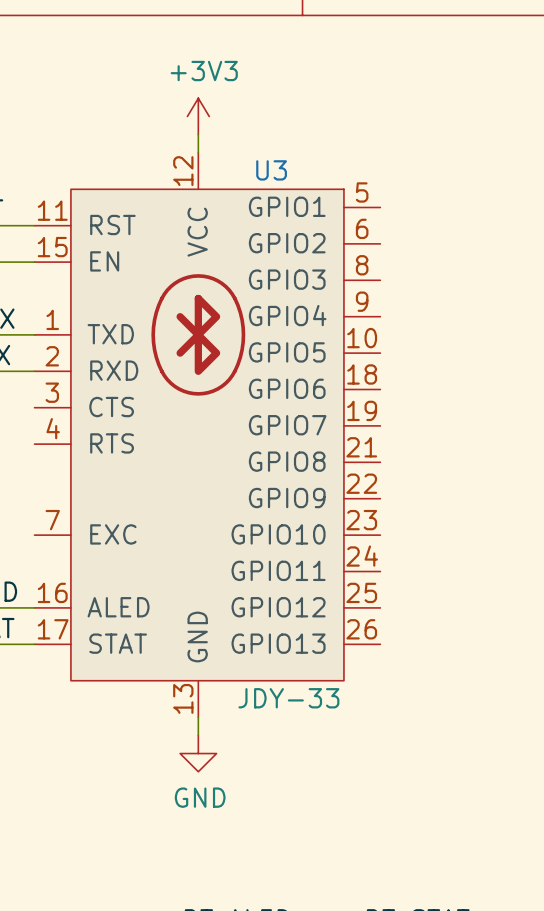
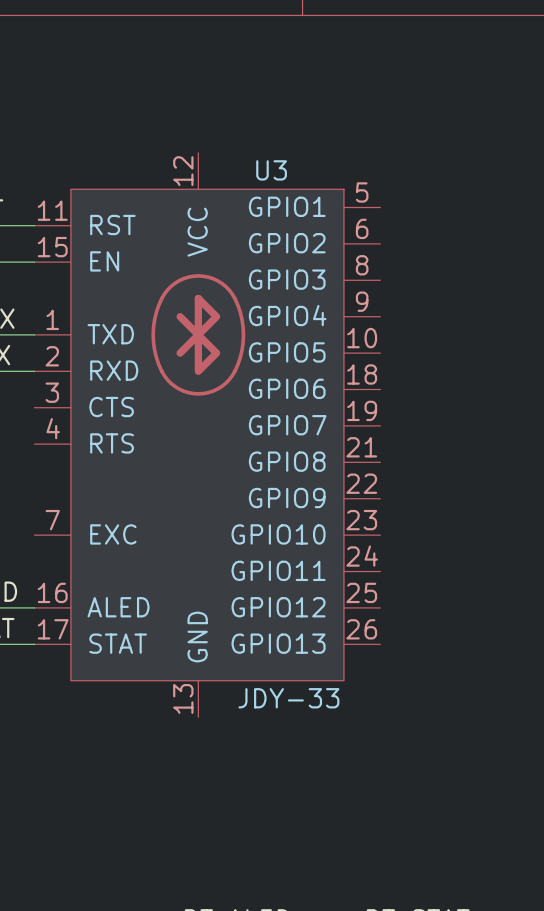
power symbol: +3V3 (198, 116) -> none
wire: (198, 134) (198, 152) -> none
wire: (198, 717) (198, 735) -> none
power symbol: GND (198, 753) -> none

